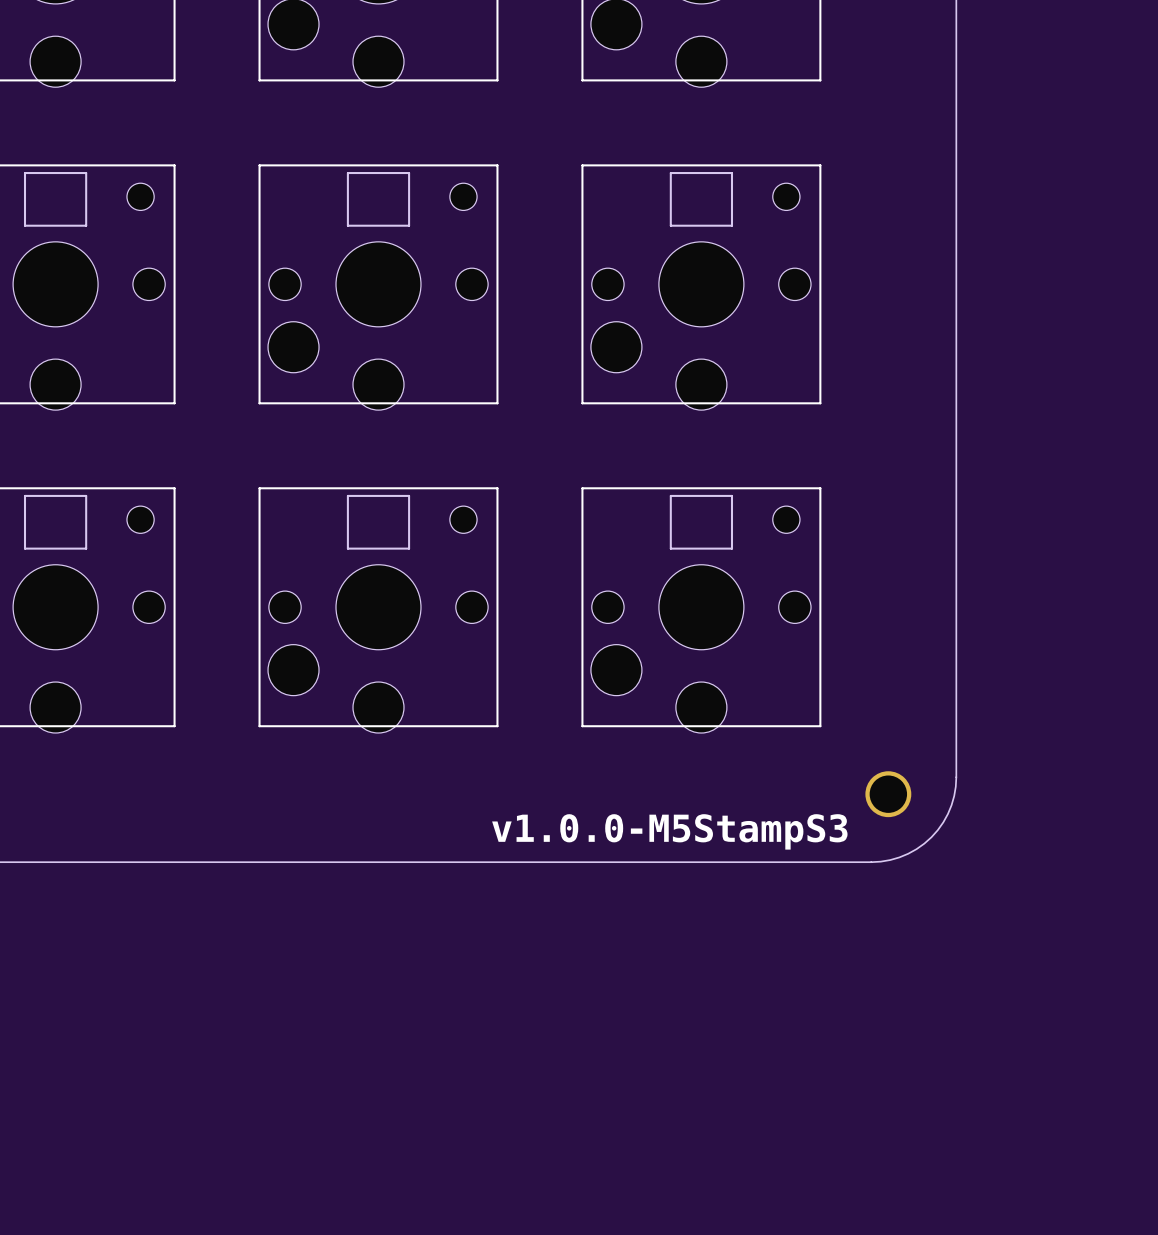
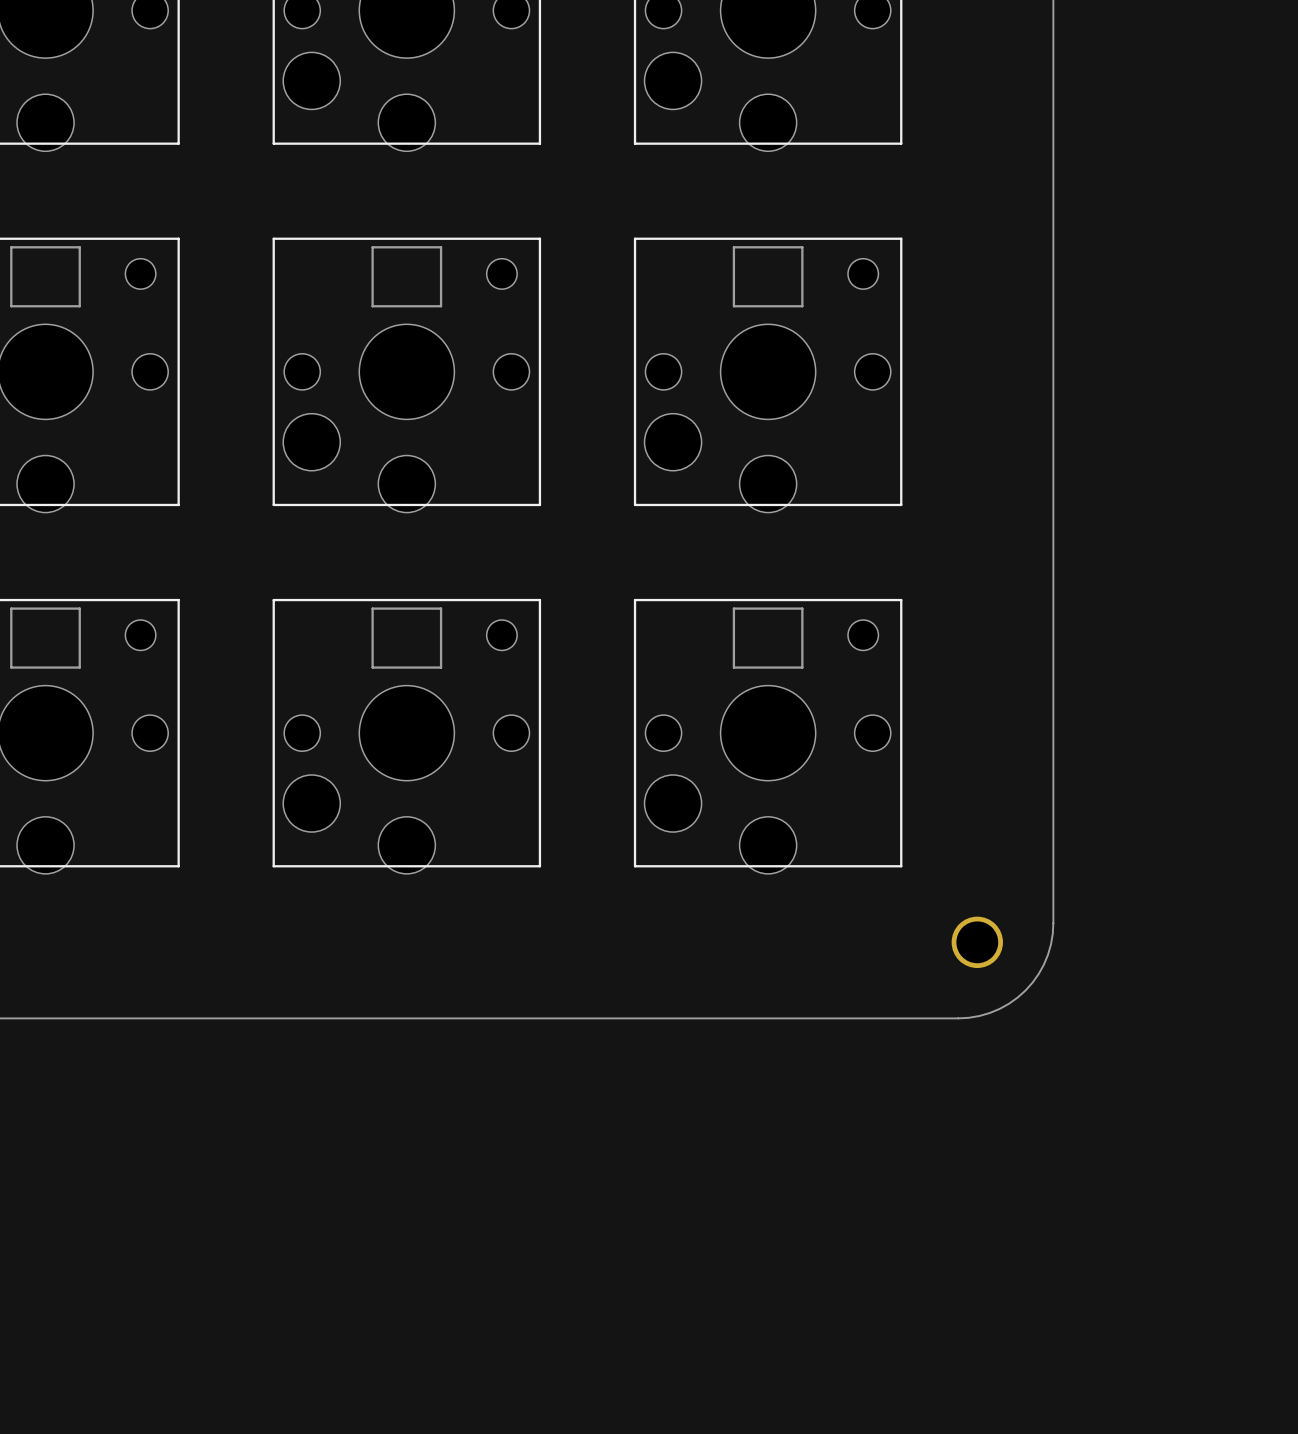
text: v1.0.0-M5StampS3 (669, 831) -> none

